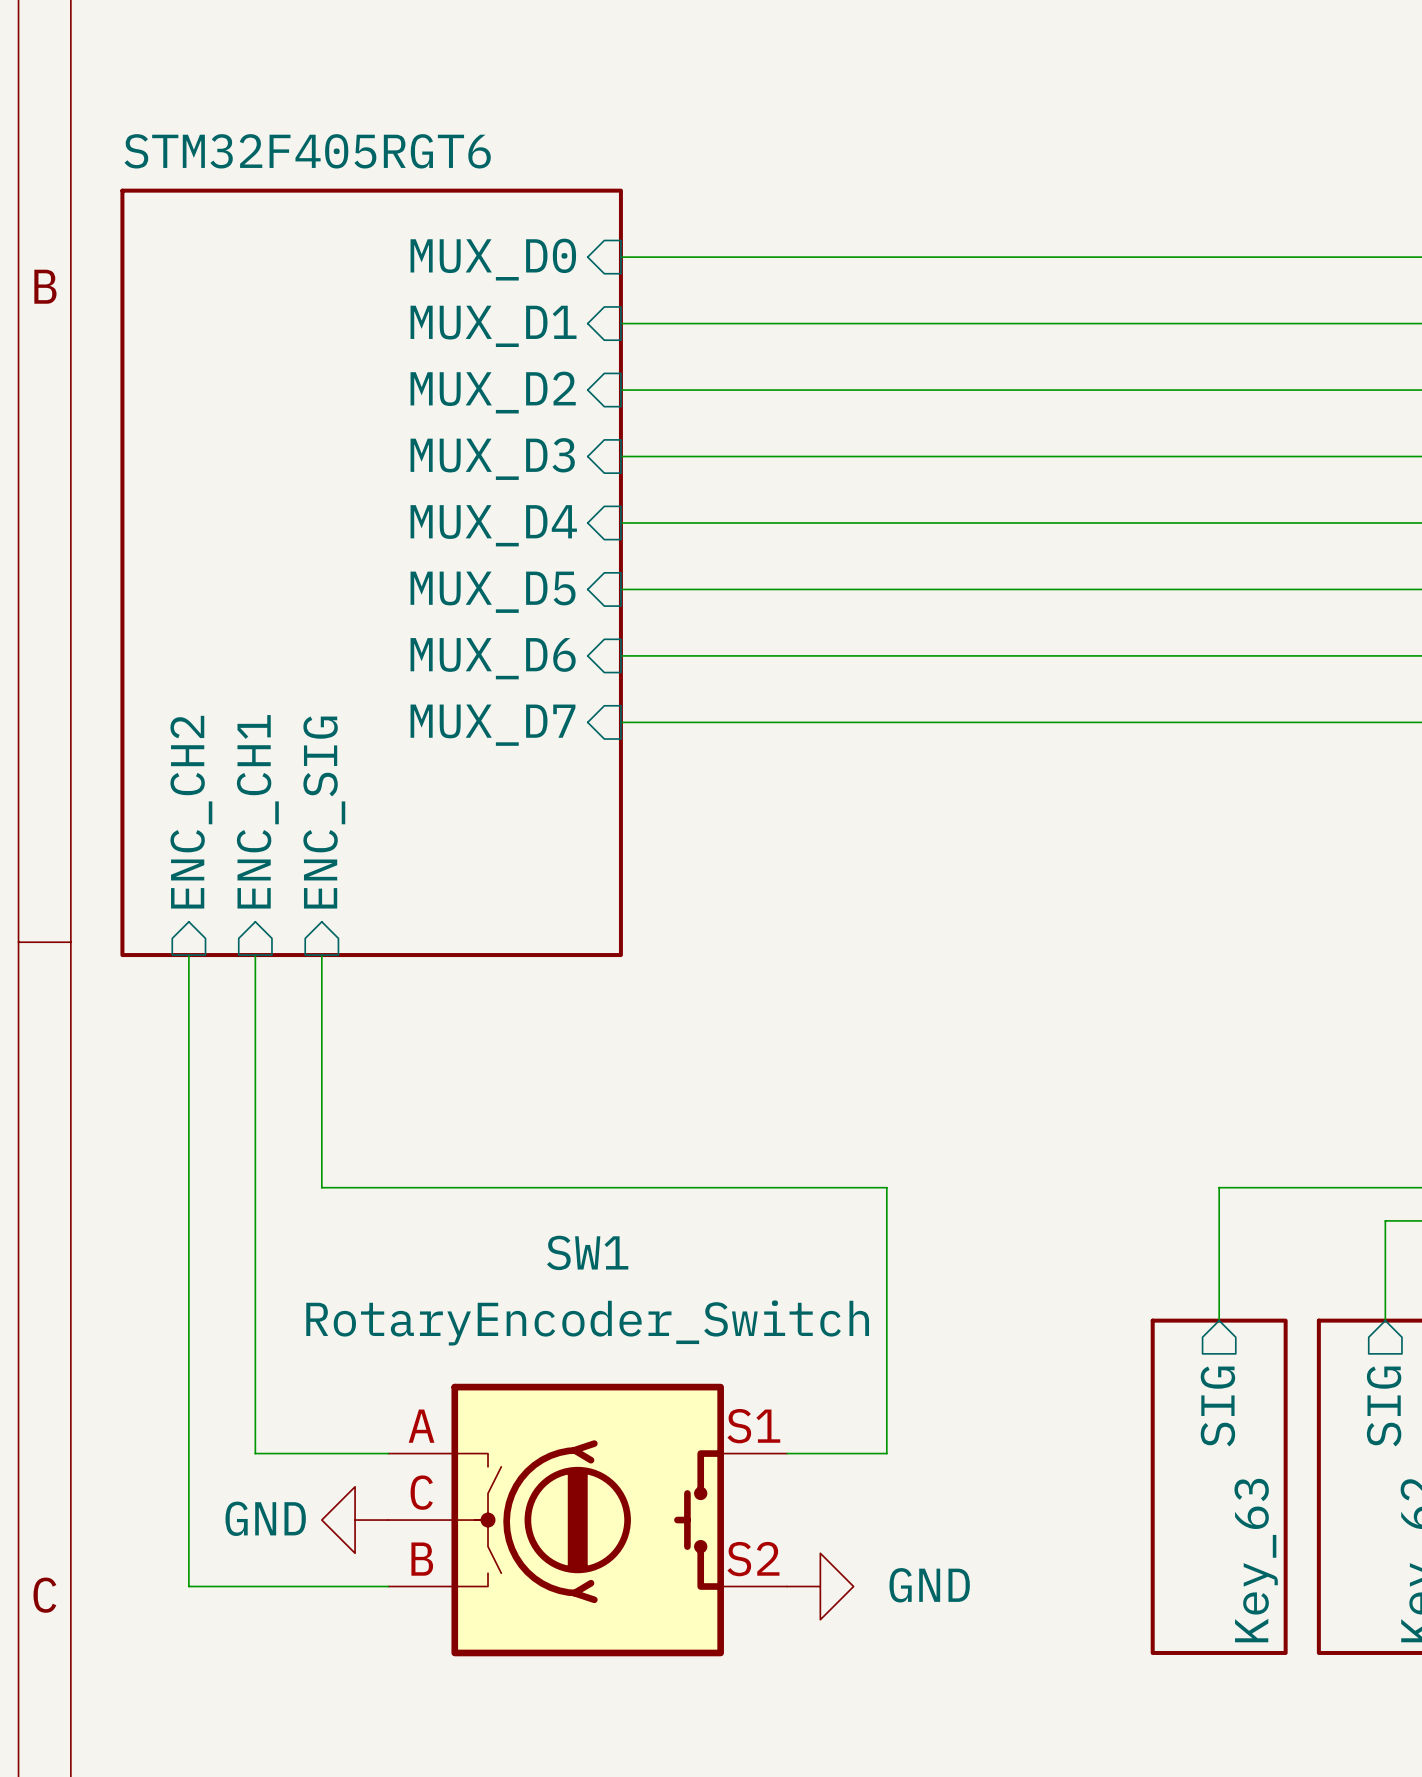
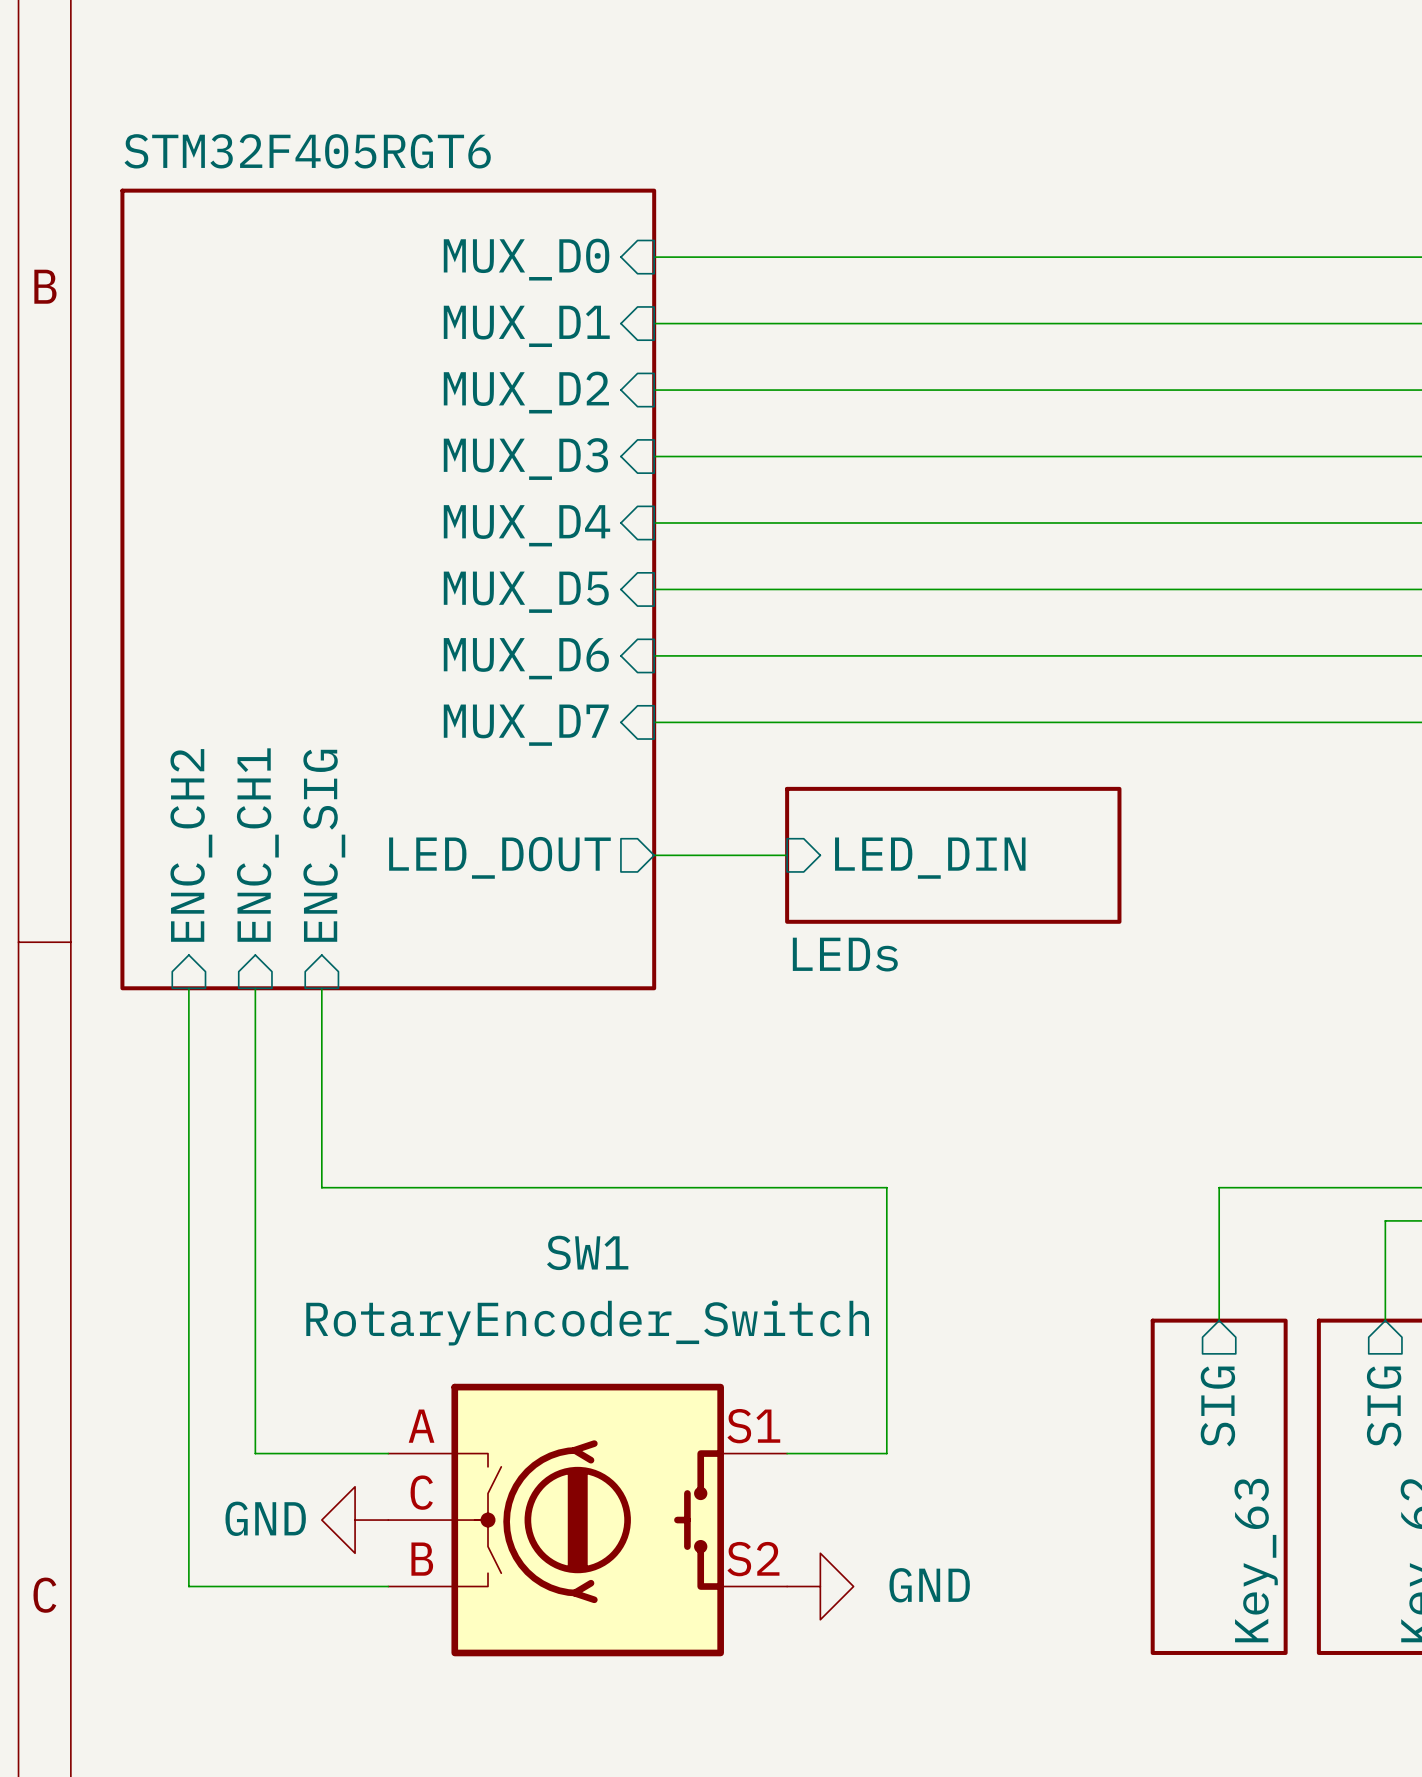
sheet STM32F405RGT6 shape: [120, 188, 623, 958] -> [120, 188, 657, 991]
wire: (620, 257) (654, 257) -> none
sheet pin position: MUX_D0 (493, 259) -> MUX_D0 (526, 259)
wire: (620, 323) (654, 323) -> none
sheet pin position: MUX_D1 (493, 326) -> MUX_D1 (526, 326)
wire: (620, 390) (654, 390) -> none
sheet pin position: MUX_D2 (493, 392) -> MUX_D2 (526, 392)
wire: (620, 456) (654, 456) -> none
sheet pin position: MUX_D3 (492, 459) -> MUX_D3 (525, 459)
wire: (620, 522) (654, 522) -> none
sheet pin position: MUX_D4 (493, 525) -> MUX_D4 (526, 525)
wire: (620, 589) (654, 589) -> none
sheet pin position: MUX_D5 (493, 592) -> MUX_D5 (526, 592)
wire: (620, 655) (654, 655) -> none
sheet pin position: MUX_D6 (493, 658) -> MUX_D6 (526, 658)
wire: (620, 722) (654, 722) -> none
sheet pin position: MUX_D7 (493, 725) -> MUX_D7 (526, 725)
sheet pin position: ENC_CH1 (257, 811) -> ENC_CH1 (257, 845)
sheet pin position: ENC_CH2 (191, 812) -> ENC_CH2 (191, 845)
sheet pin position: ENC_SIG (324, 812) -> ENC_SIG (324, 845)
wire: none -> (654, 855) (787, 855)
sheet LEDs: none -> (953, 855)
sheet pin: none -> LED_DOUT (499, 857)
sheet pin: none -> LED_DIN (930, 858)
wire: (188, 955) (188, 988) -> none
wire: (255, 955) (255, 988) -> none
wire: (321, 955) (321, 988) -> none

